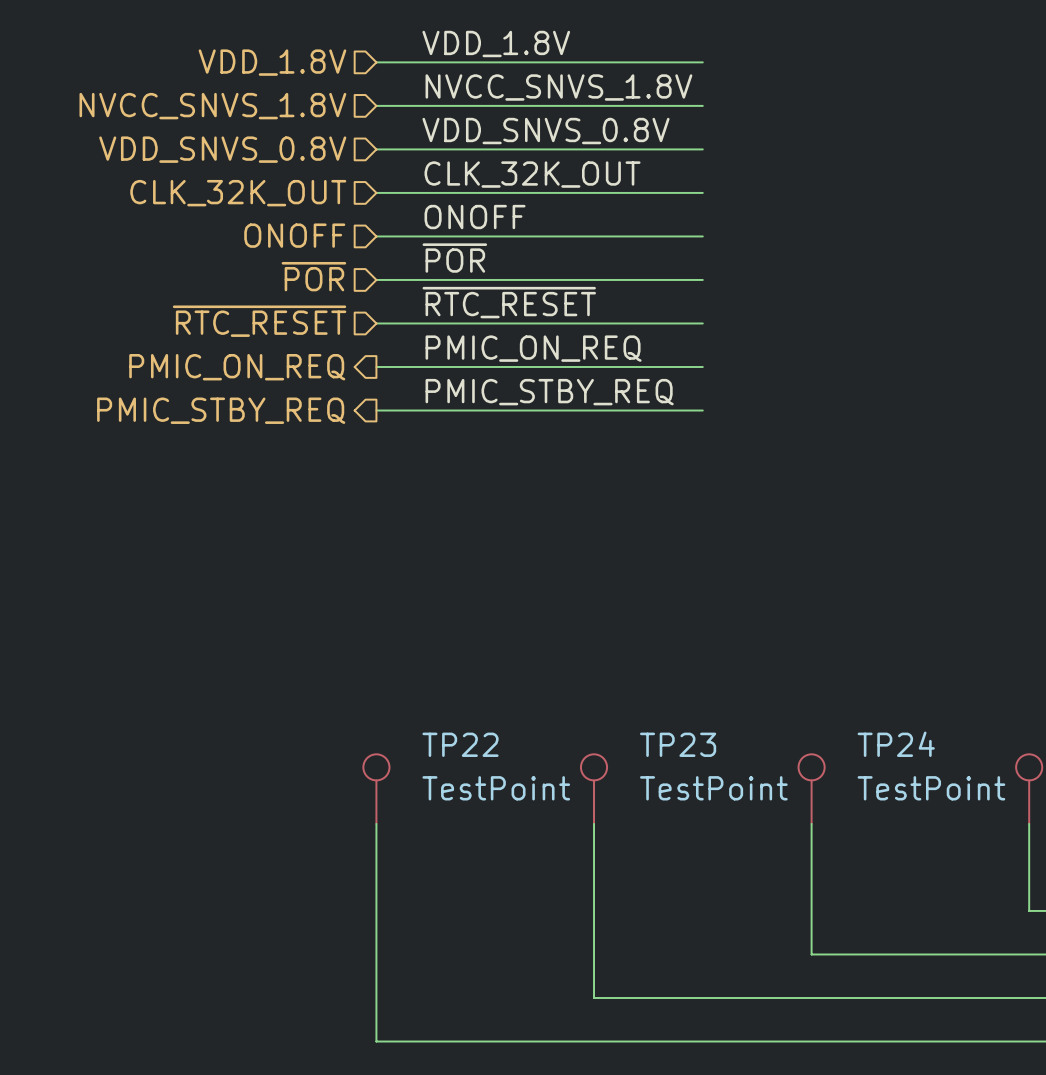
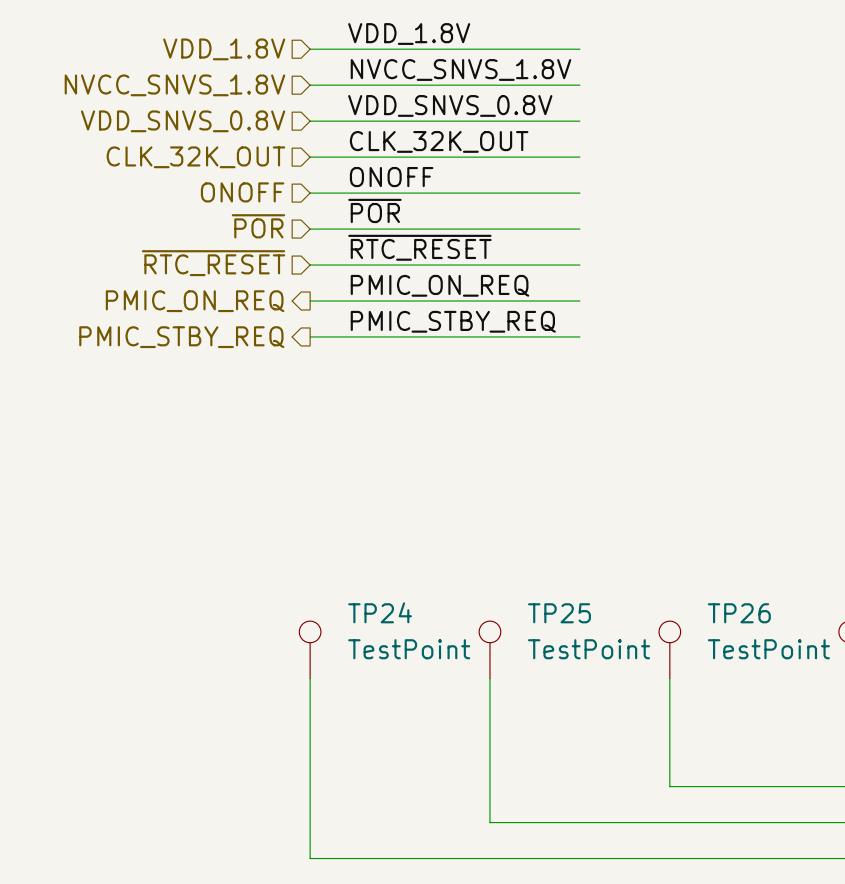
TP22 name: TP22 (460, 744) -> TP24 (380, 612)
TP23 name: TP23 (678, 744) -> TP25 (559, 613)
TP24 name: TP24 (896, 744) -> TP26 (739, 613)

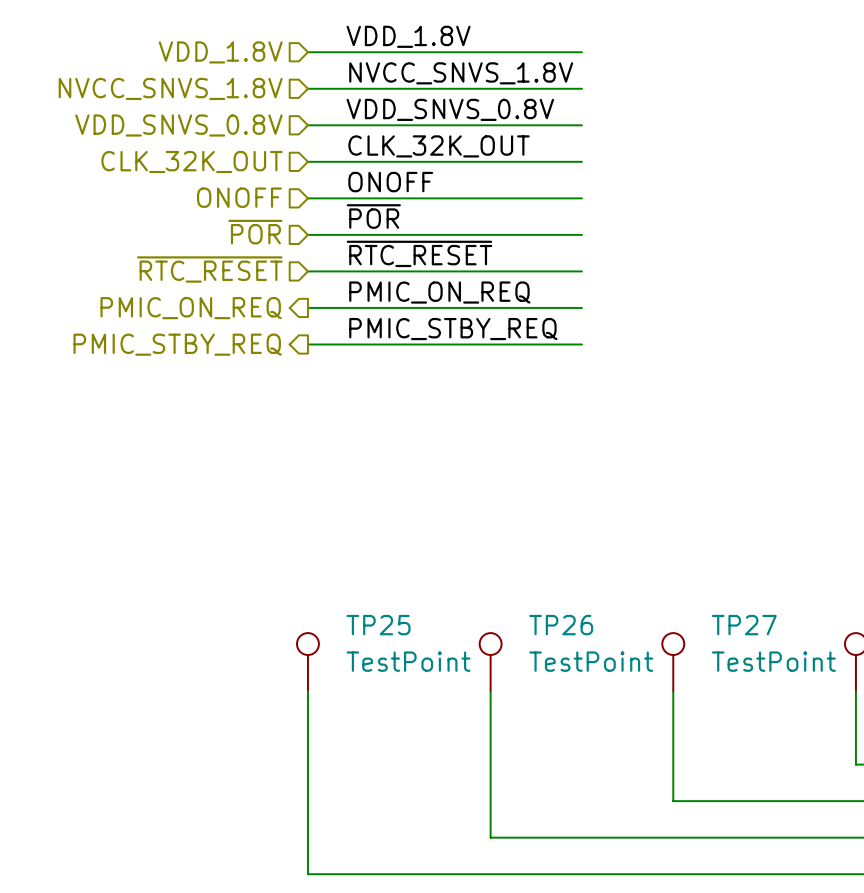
TP24 name: TP24 (380, 612) -> TP25 (378, 625)
TP25 name: TP25 (559, 613) -> TP26 (561, 625)
TP26 name: TP26 (739, 613) -> TP27 (744, 625)

